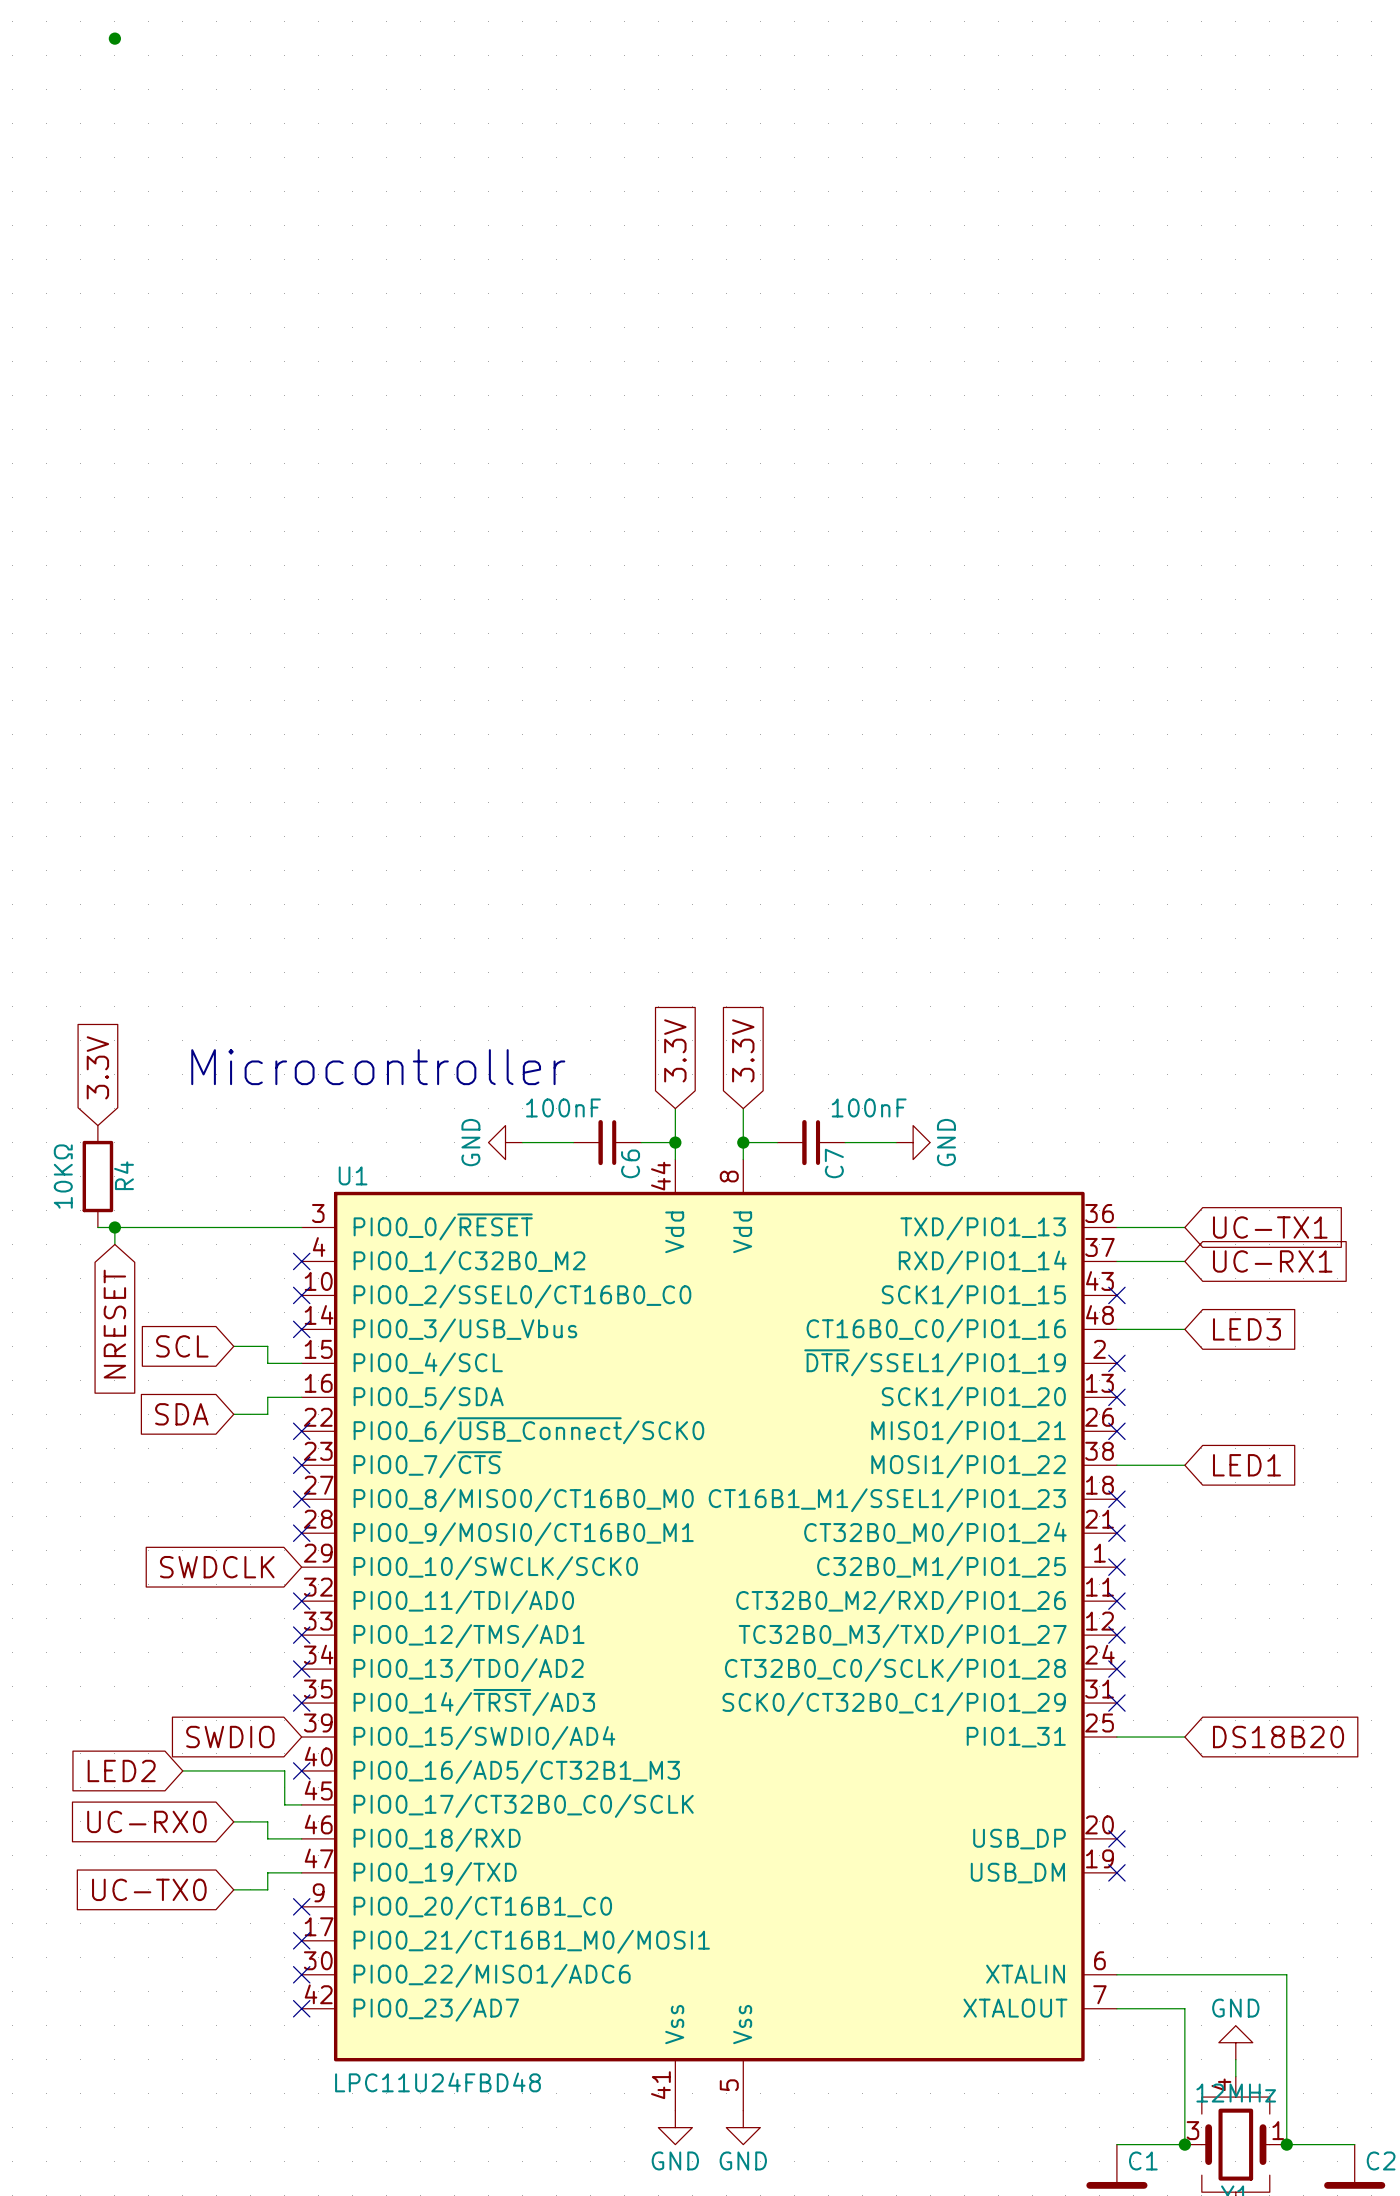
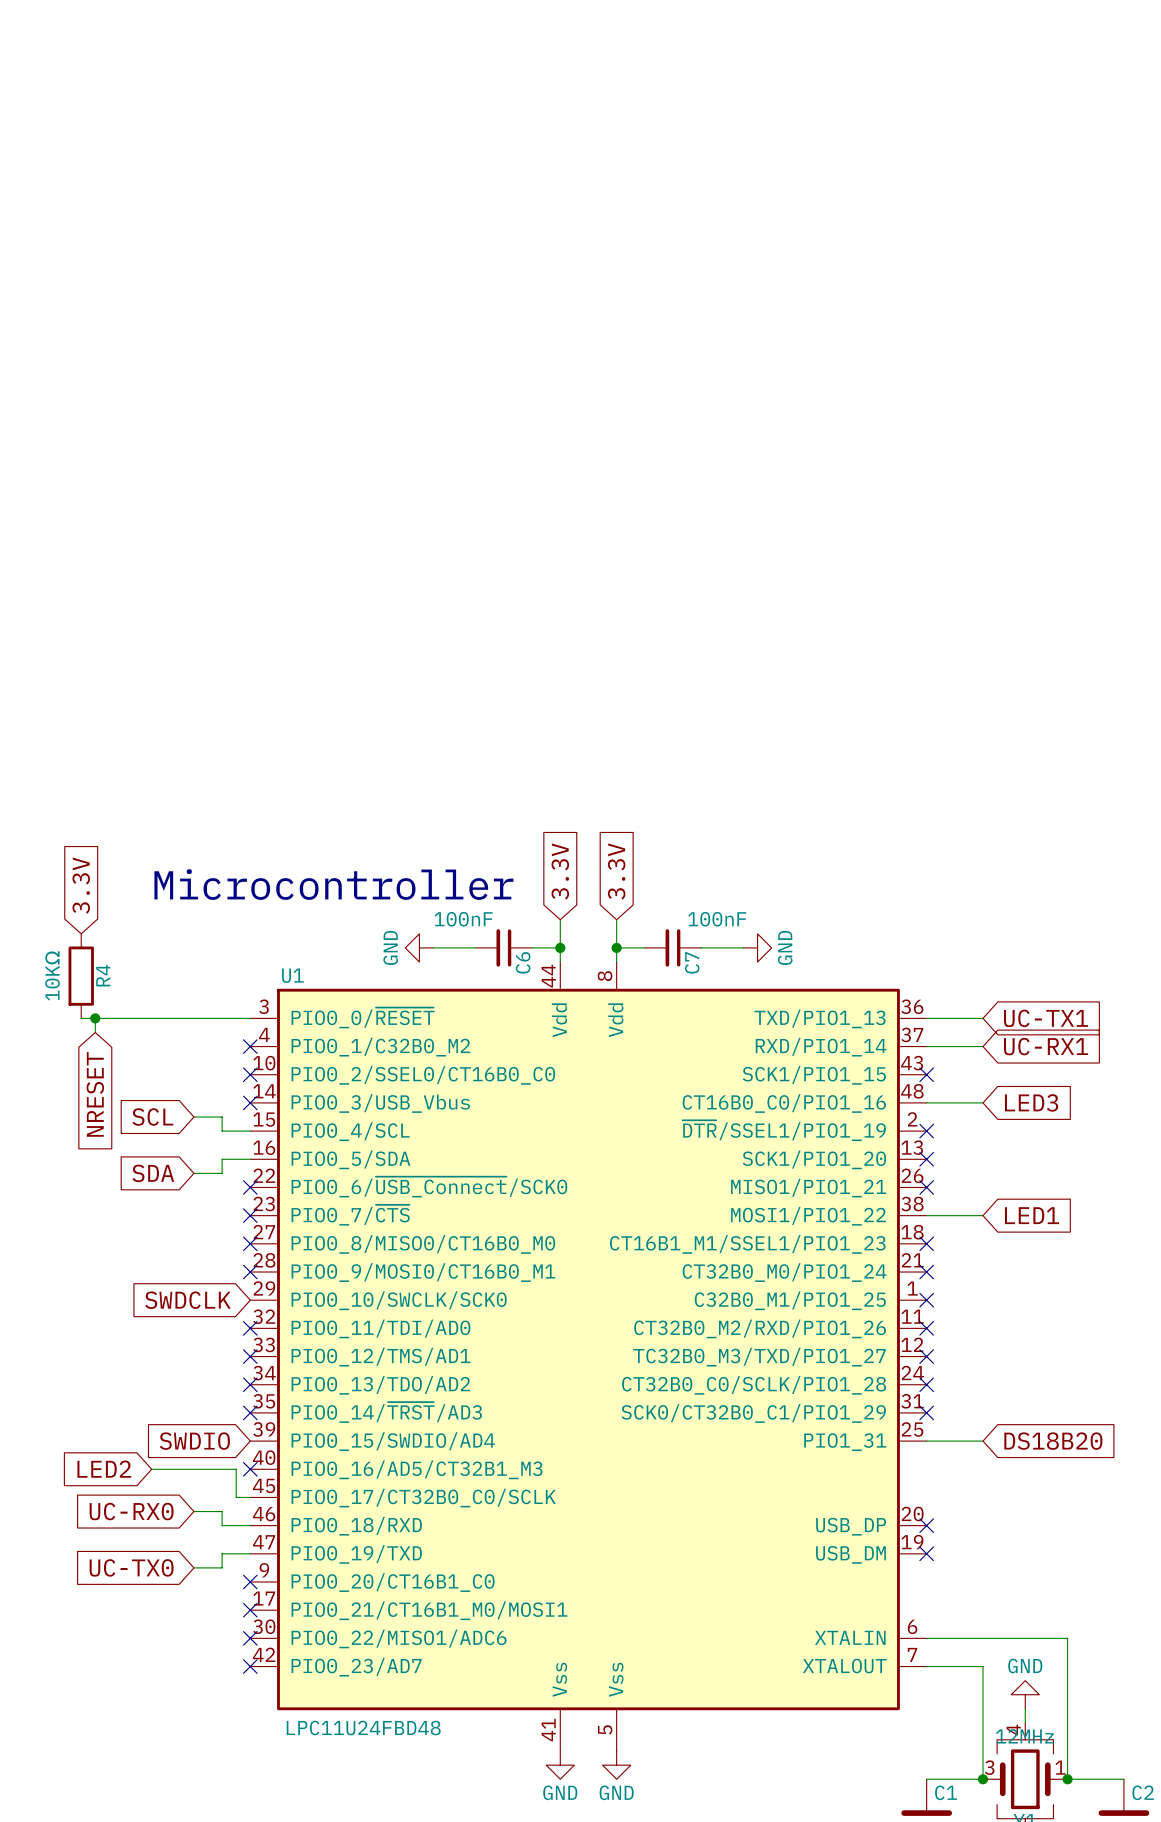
junction: (114, 38) -> none

